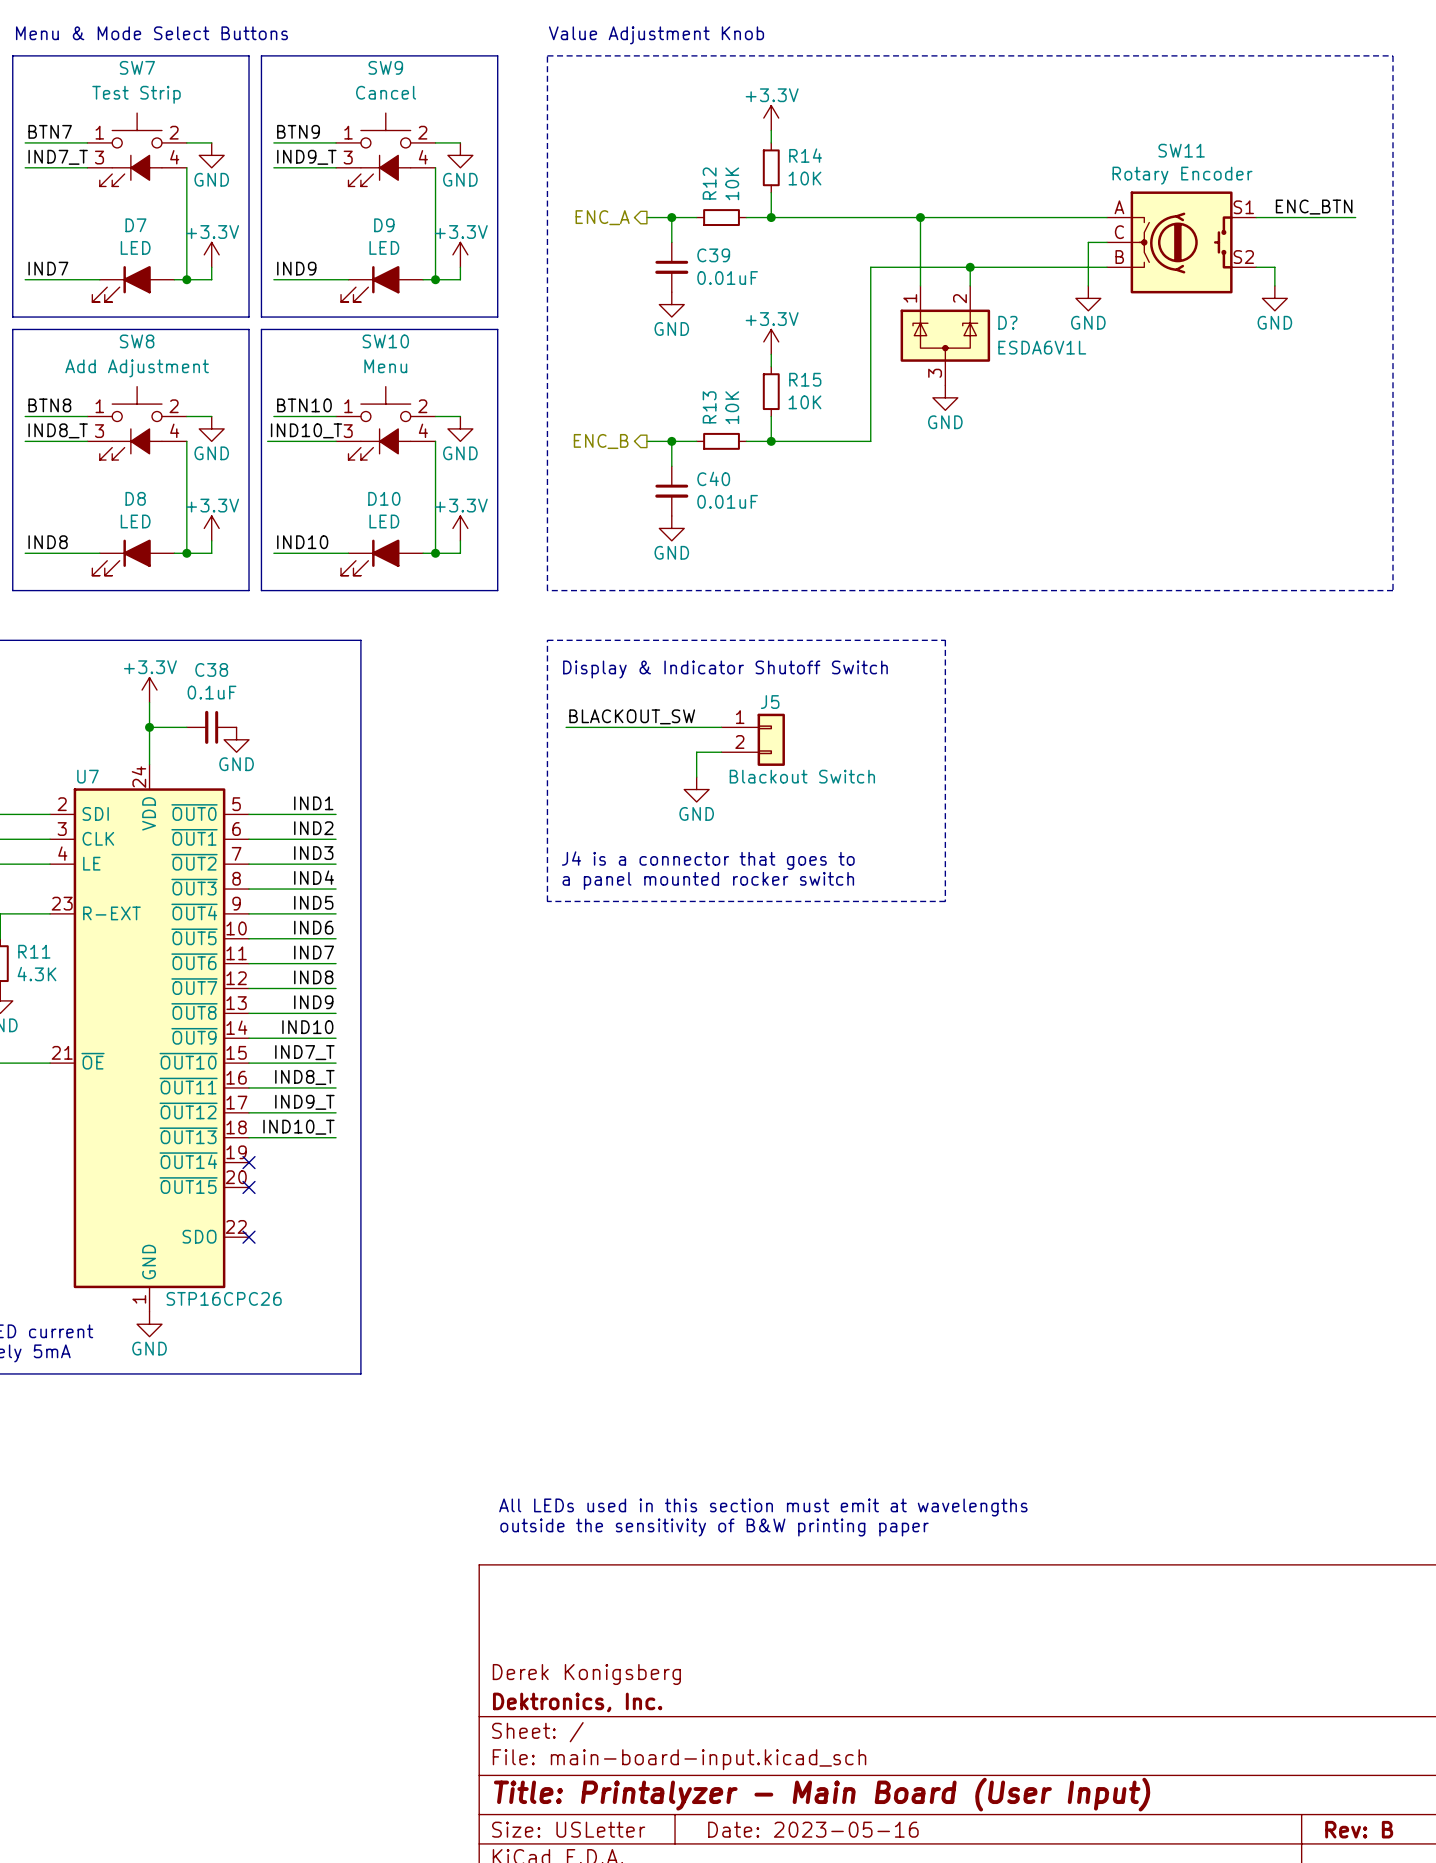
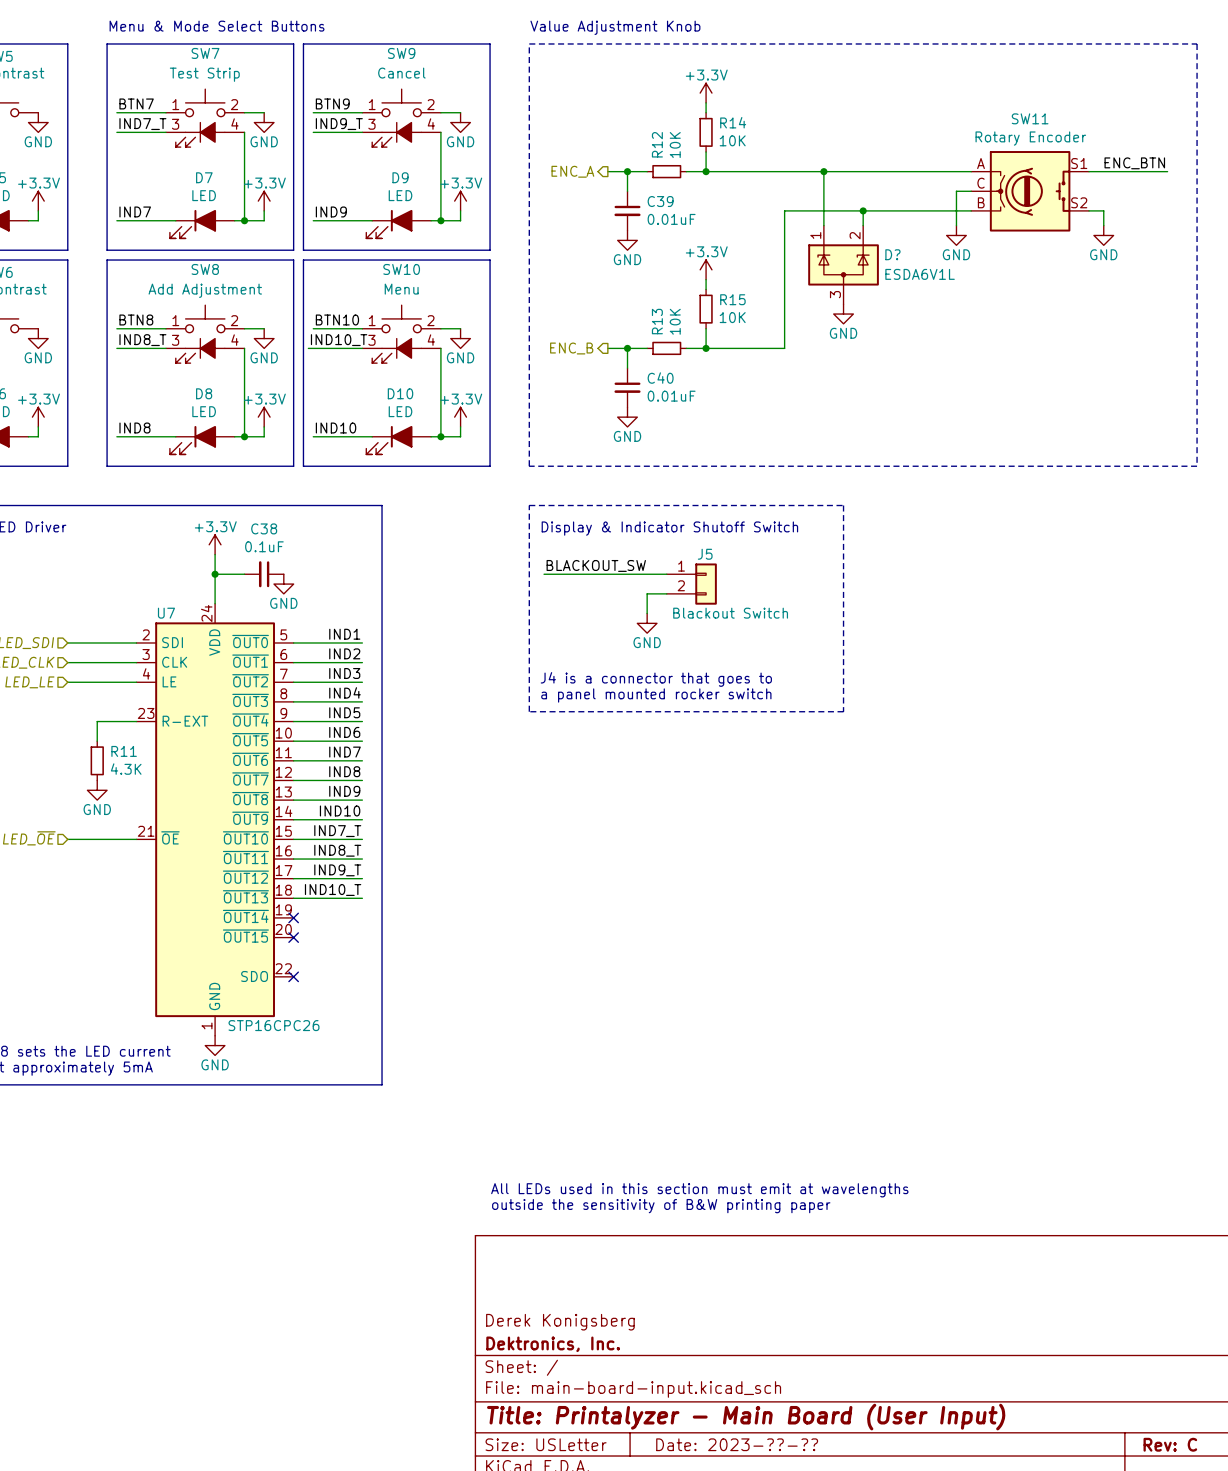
title block: Date: 2023-05-16 (813, 1829) -> Date: 2023-??-?? (737, 1444)
title block: Rev: B (1359, 1829) -> Rev: C (1170, 1444)

